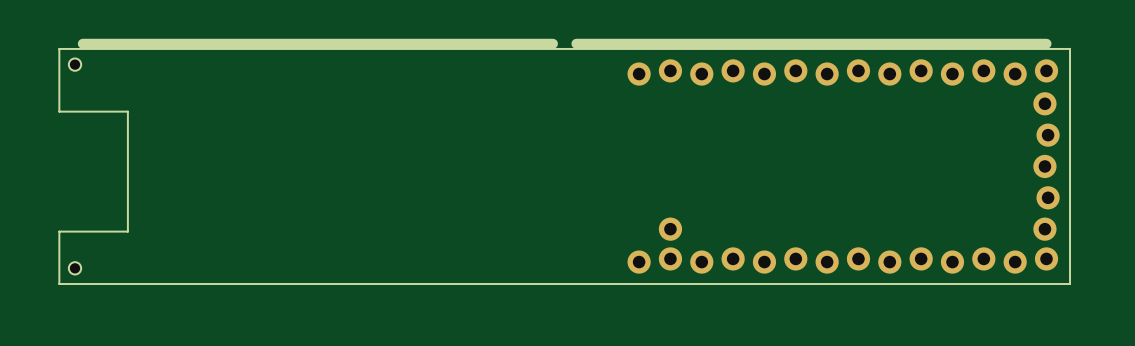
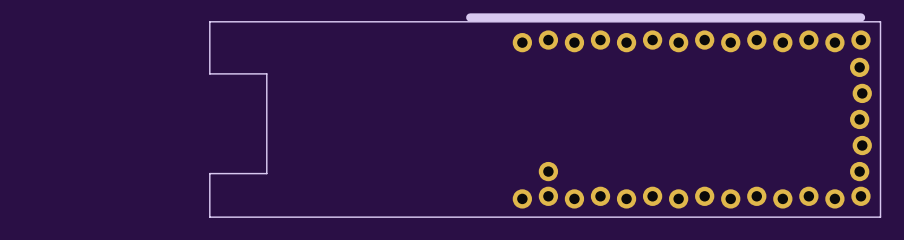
board edge: (552, 43) (82, 43) -> none
board edge: (263, 48) (59, 48) (59, 111) (127, 111) (127, 231) (59, 231) (59, 283) (263, 283) -> (209, 21) (209, 73) (266, 73) (266, 173) (209, 173) (209, 217)
hole: (75, 64) -> none
hole: (75, 268) -> none

